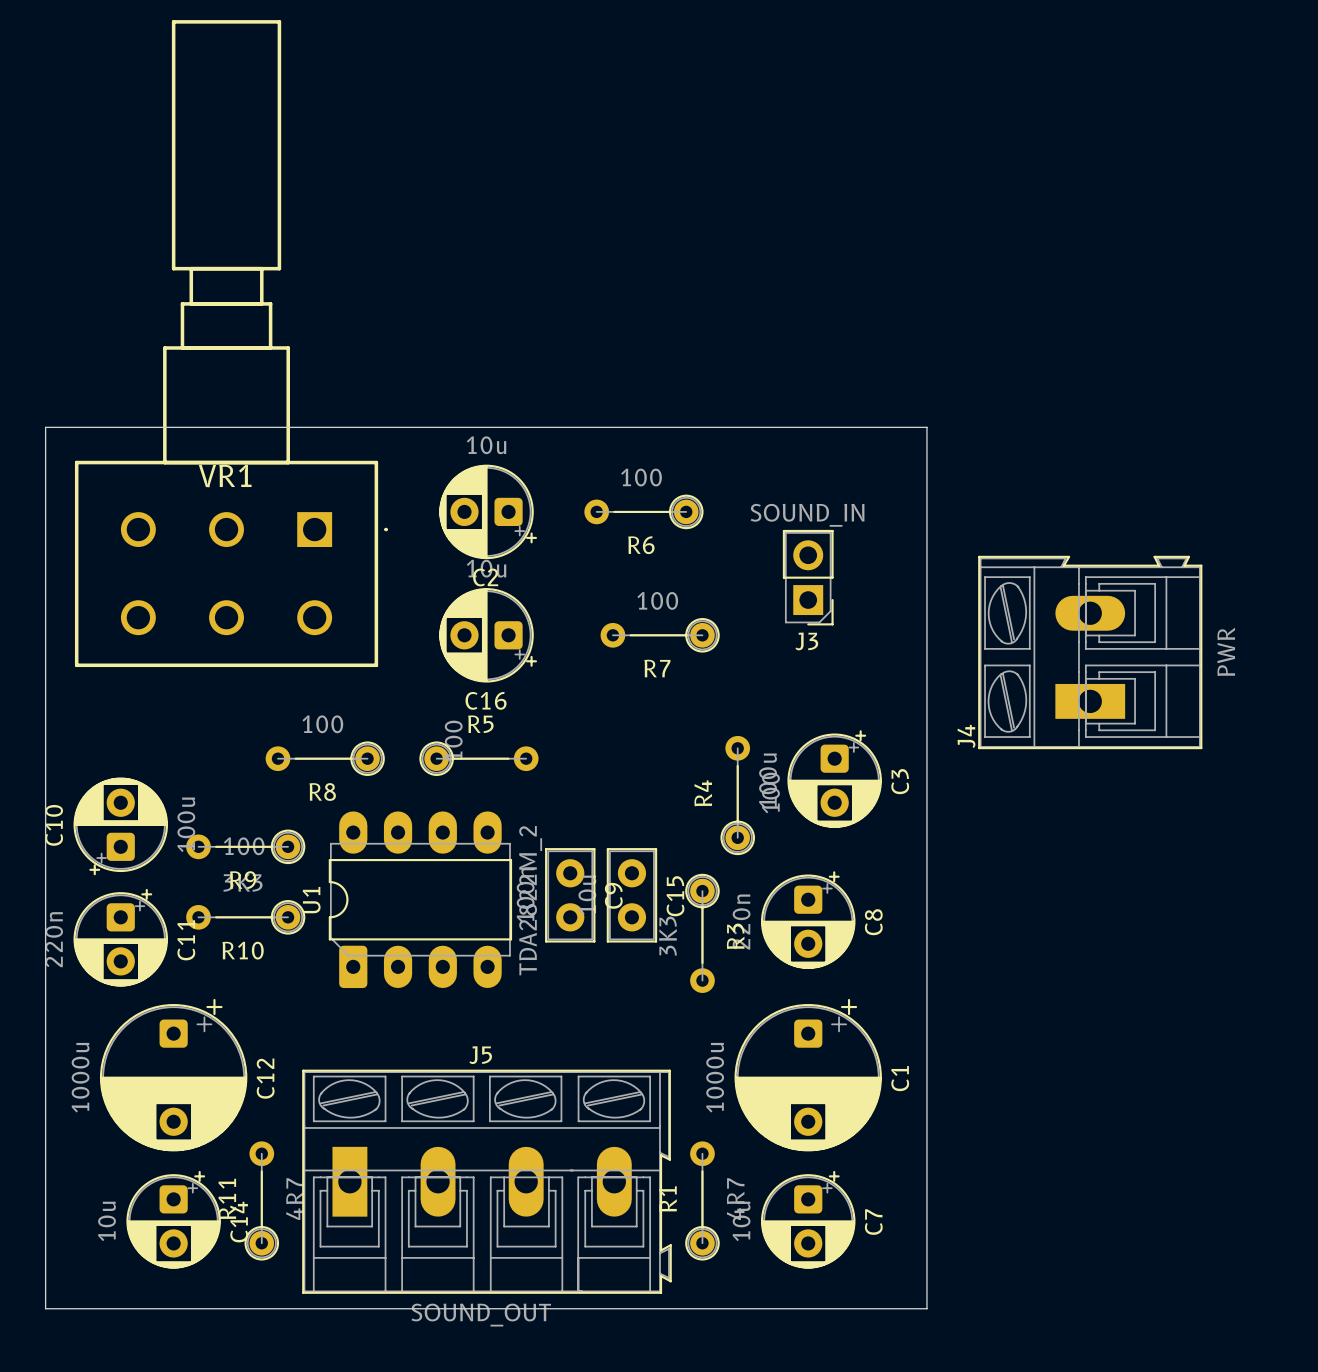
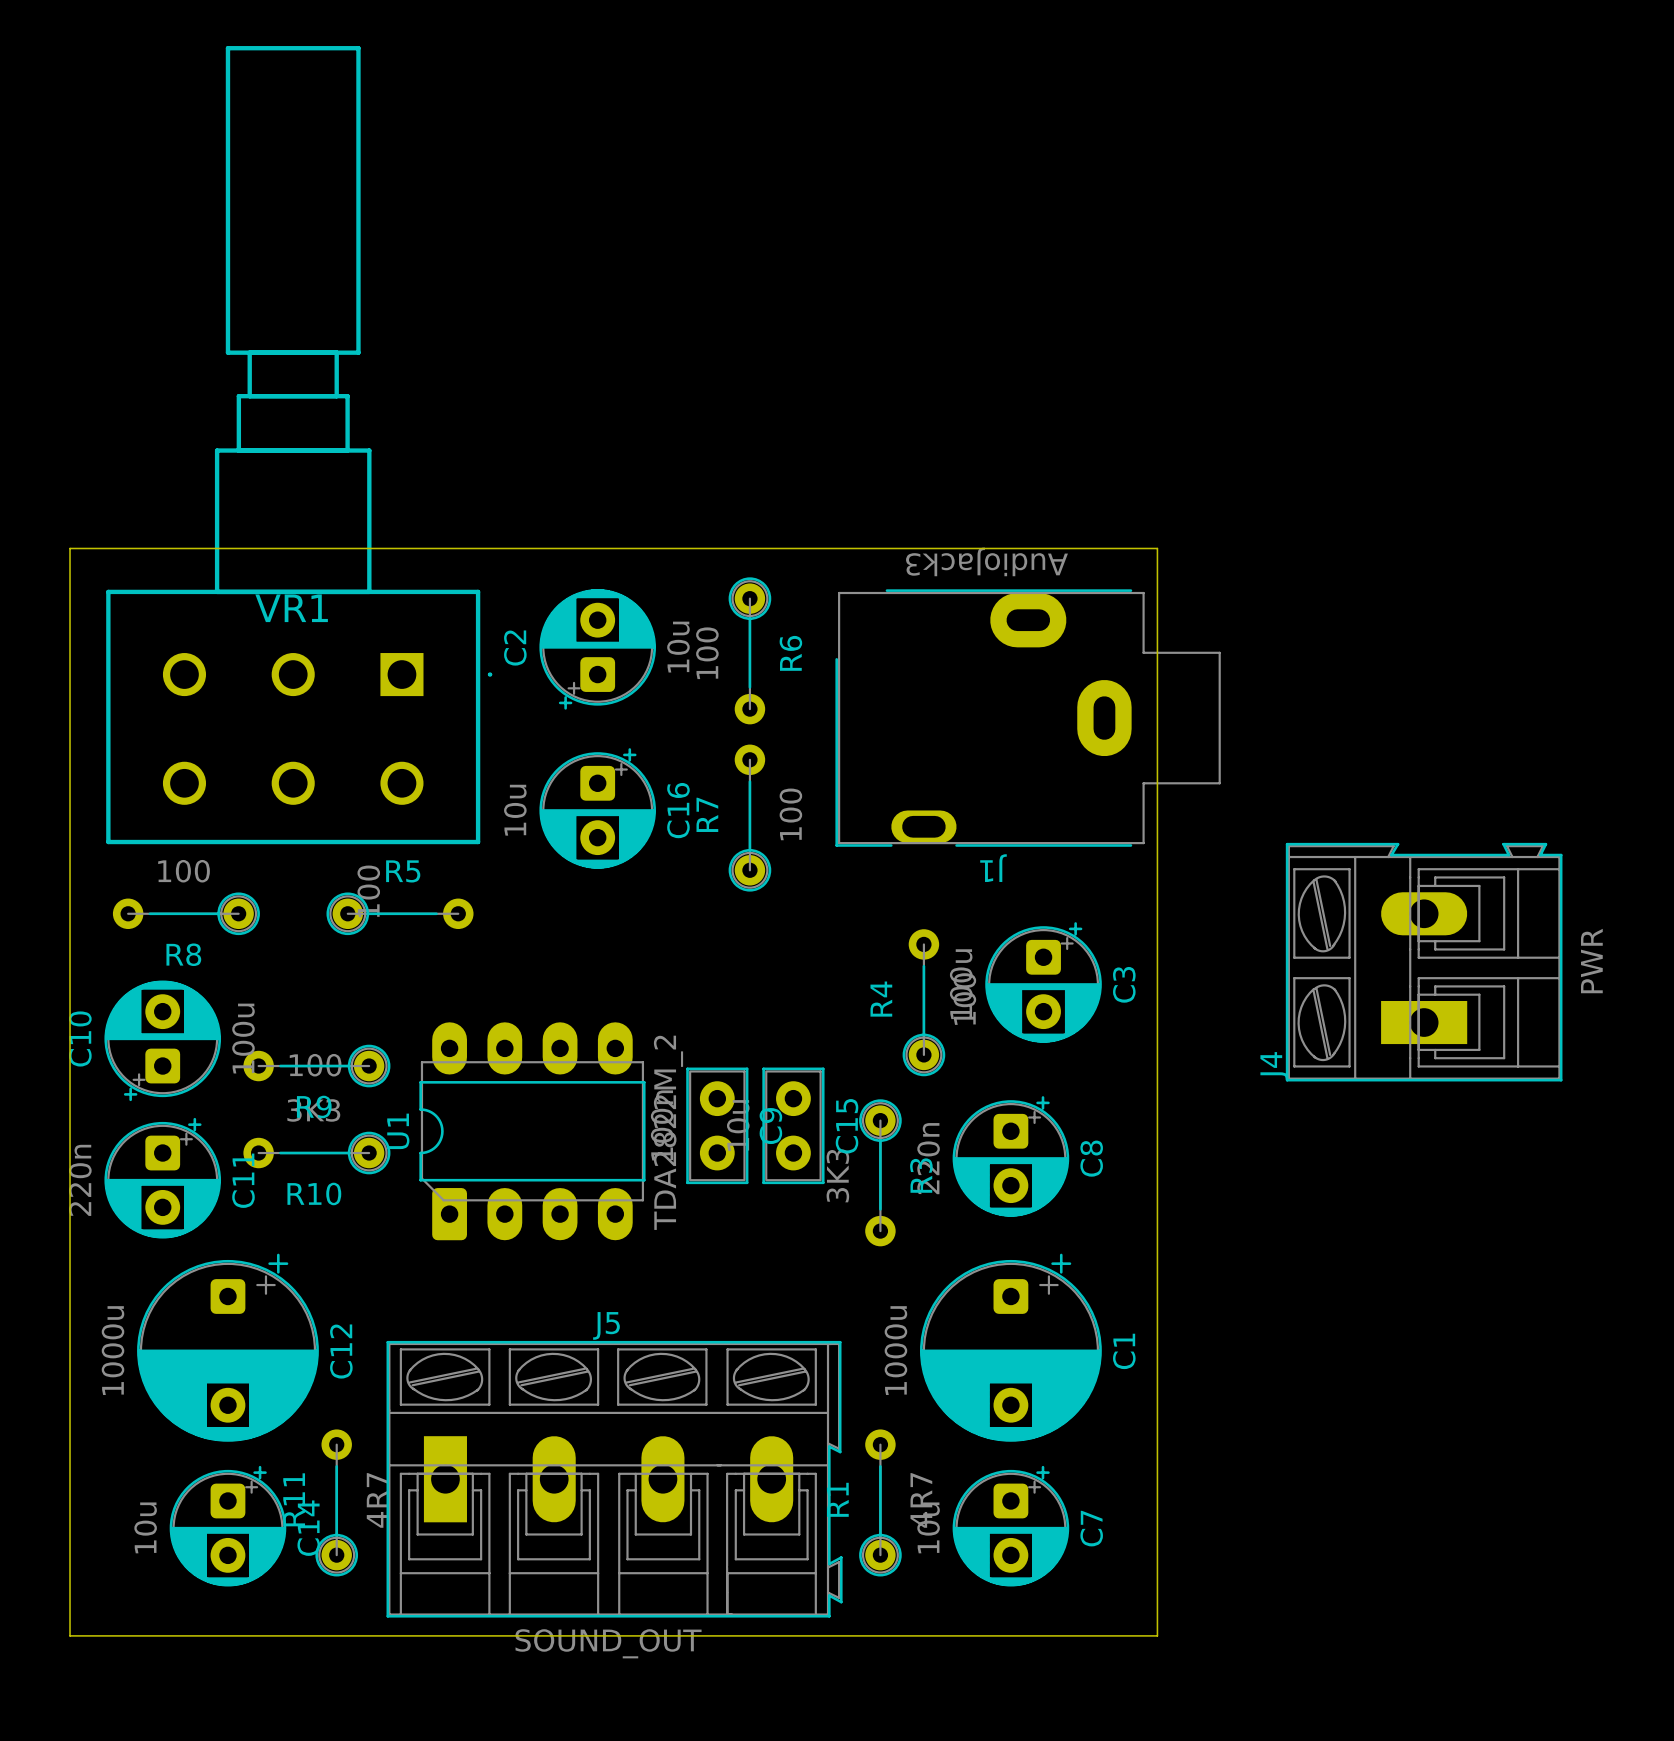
C2 rotation: 0° (488, 511) -> 90° clockwise (597, 649)
R6 rotation: 0° (643, 511) -> 90° counterclockwise (749, 650)
J1: none -> AudioJack3 (1028, 718)
J3: SOUND_IN (808, 577) -> none
C16 rotation: 0° (488, 635) -> 90° counterclockwise (597, 808)
R7 rotation: 0° (660, 635) -> 90° clockwise (749, 818)
J4 position: (1090, 652) -> (1424, 962)
R8 position: (325, 758) -> (186, 913)
R5 position: (478, 758) -> (400, 913)

